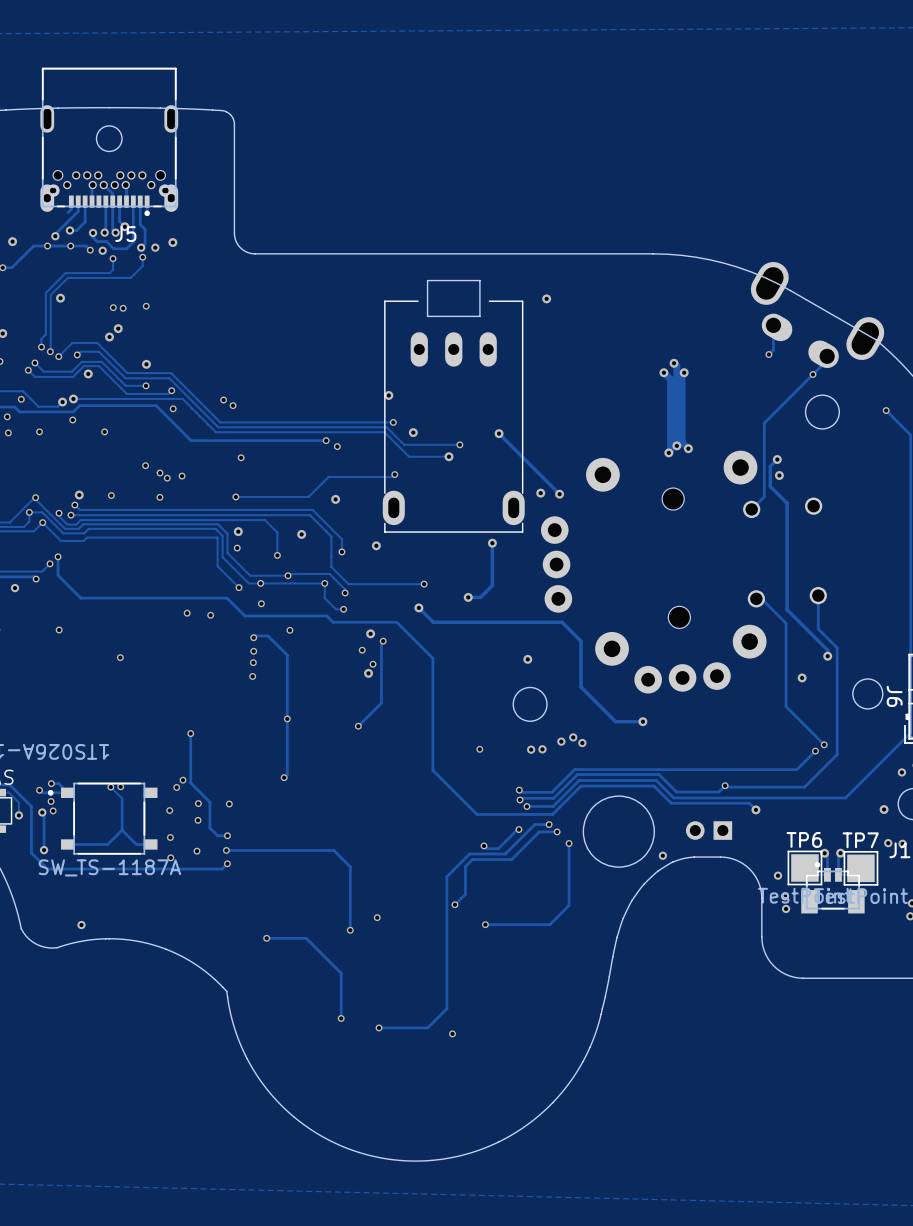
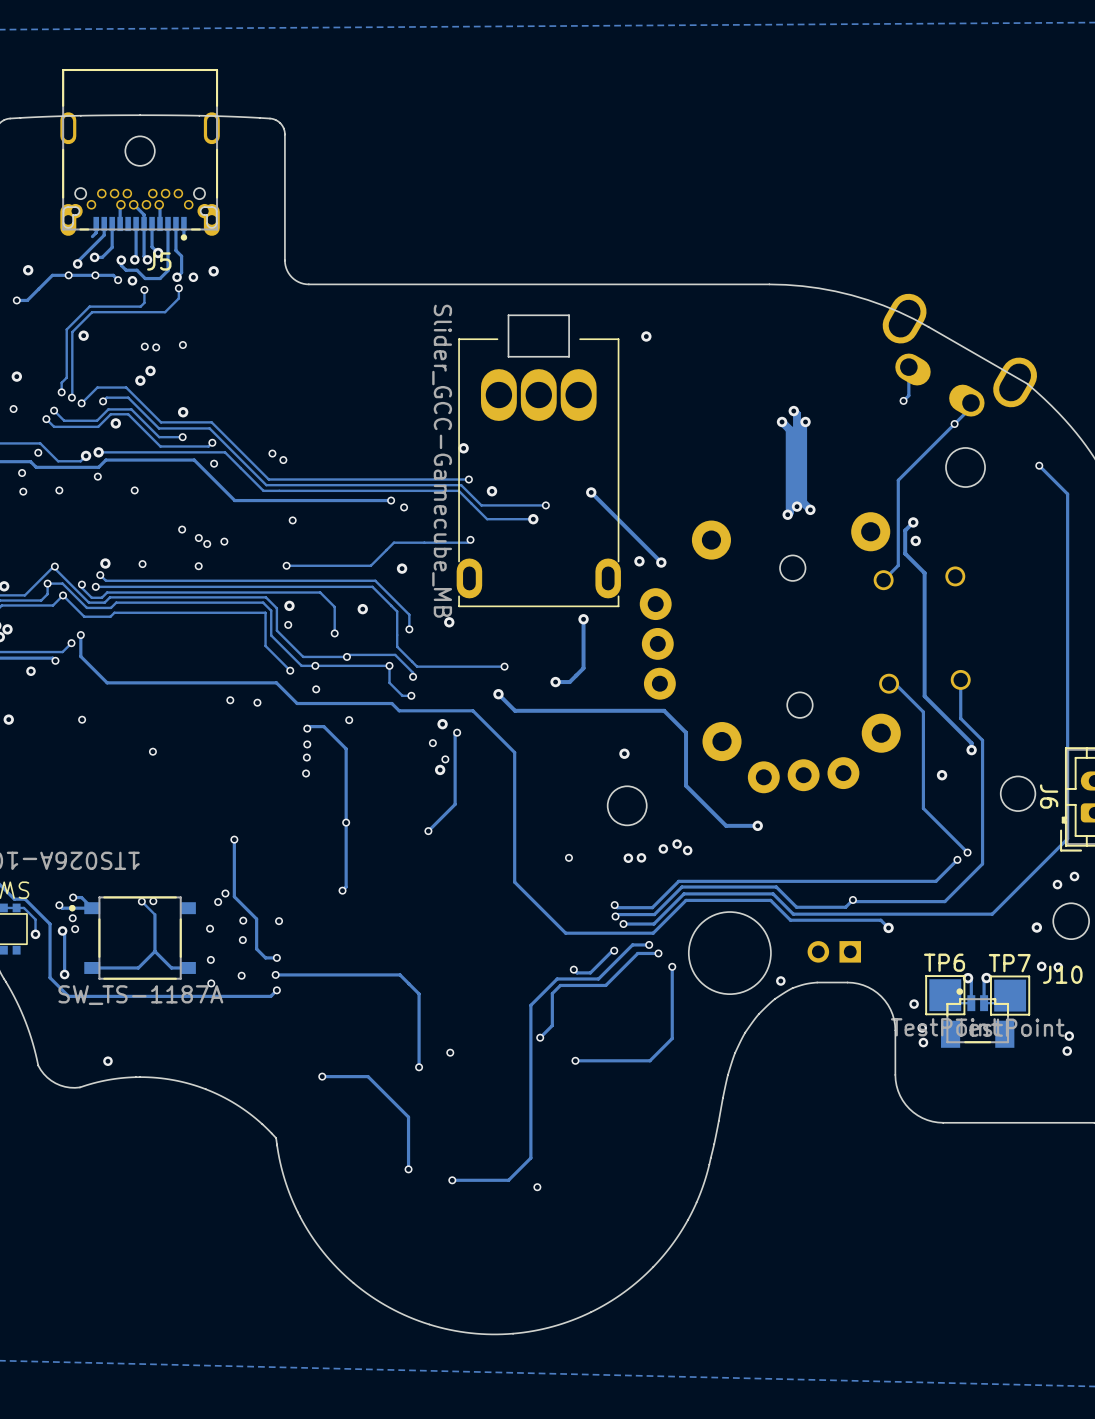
part footprint: [382, 300, 525, 533] -> [456, 338, 621, 608]
part value: none -> Slider_GCC-Gamecube_MB (442, 461)

